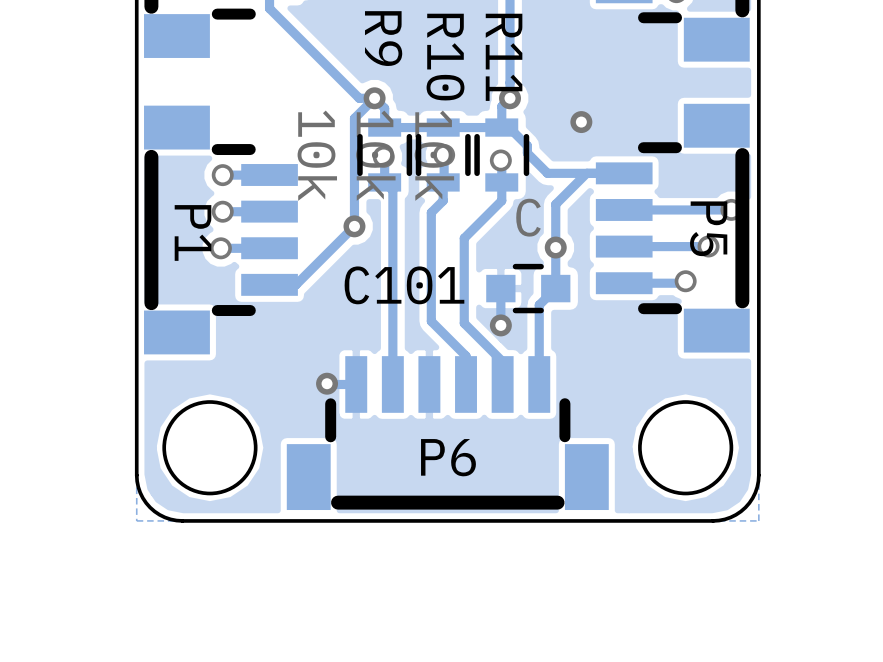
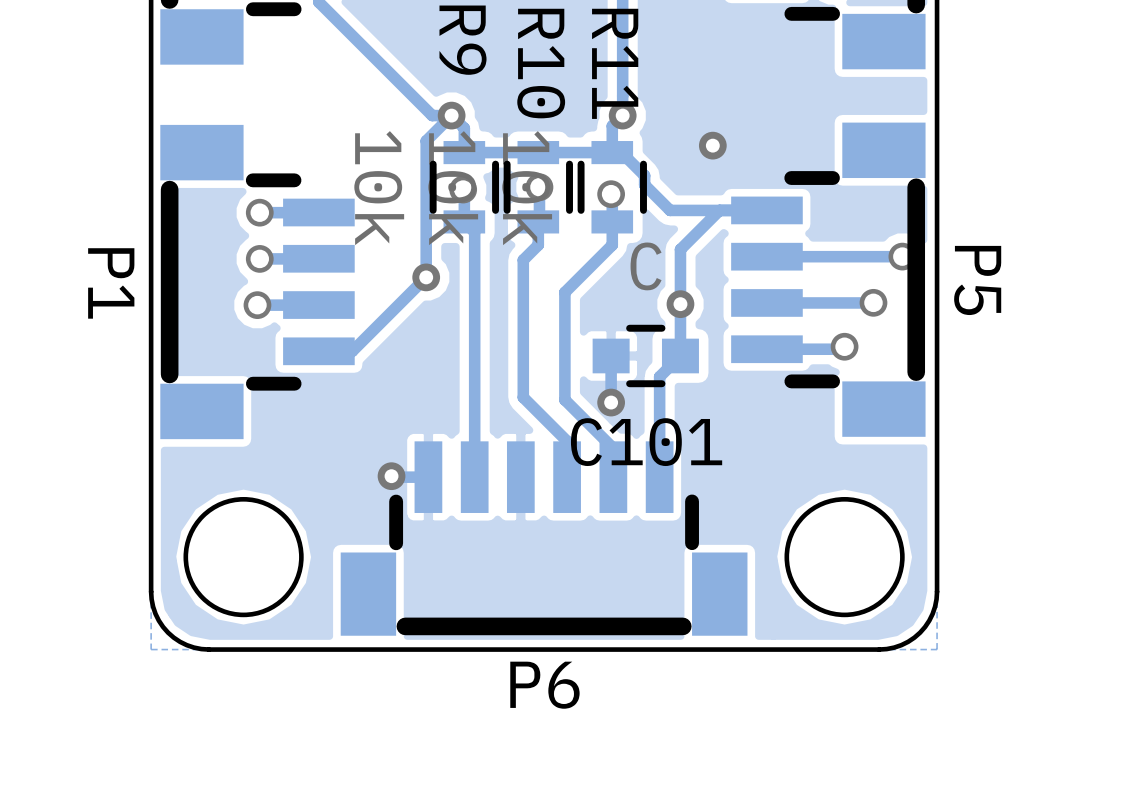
P5 name position: P5 (708, 228) -> P5 (977, 280)
P1 name position: P1 (193, 232) -> P1 (111, 283)
C101 name position: C101 (404, 285) -> C101 (646, 442)
P6 name position: P6 (448, 457) -> P6 (544, 685)

